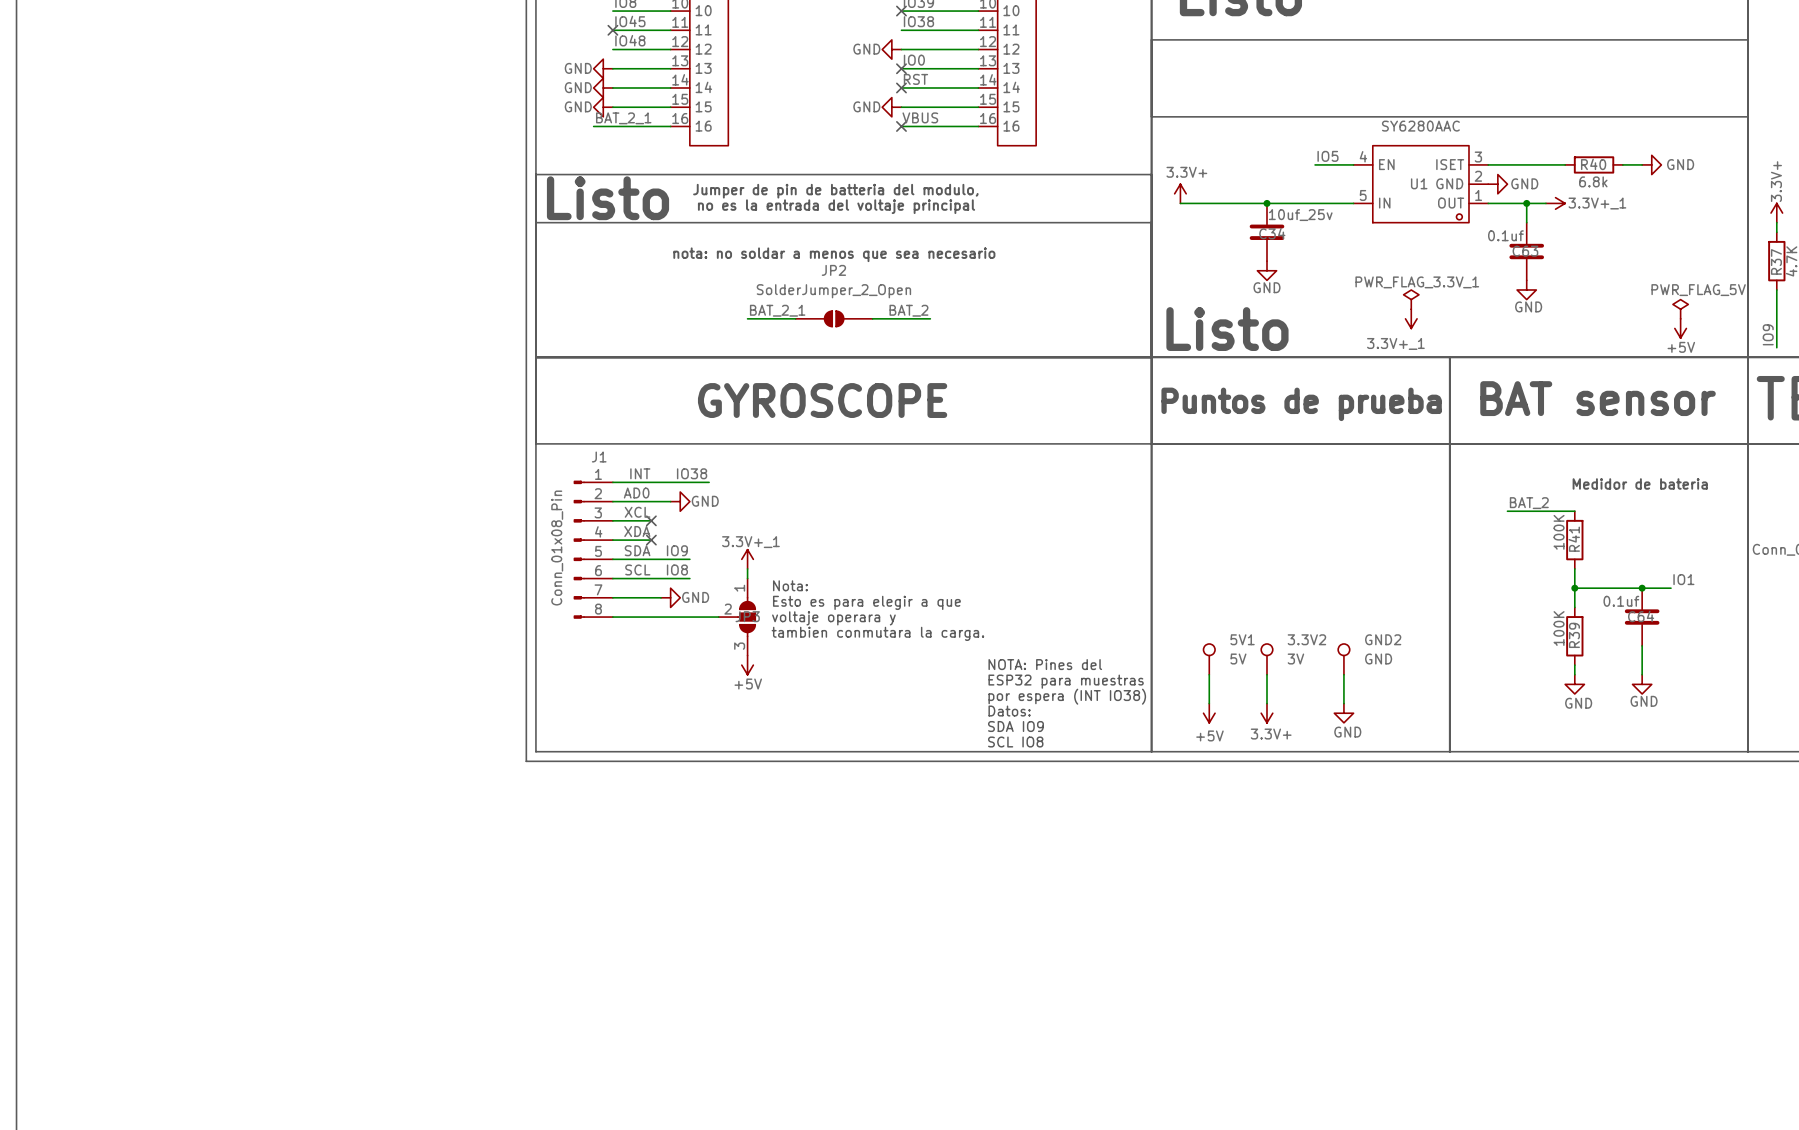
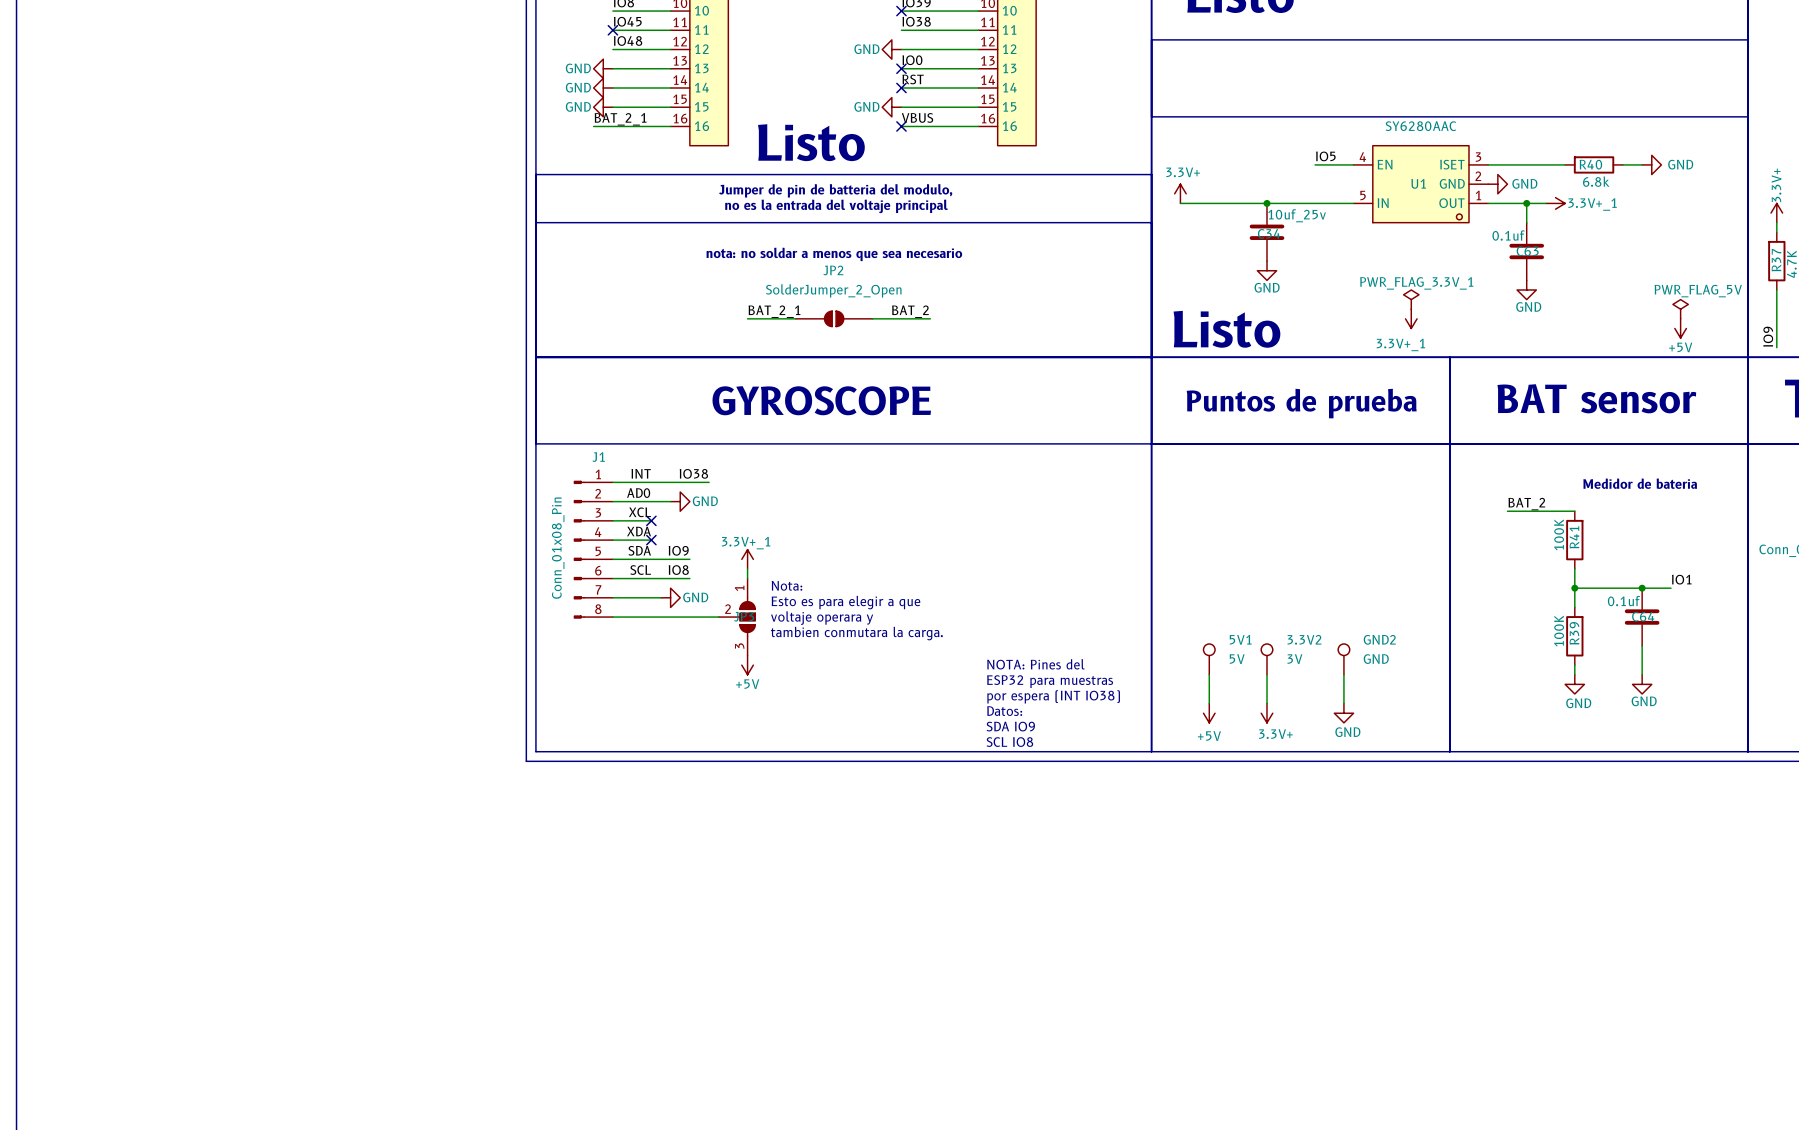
text: none -> Listo (811, 142)
text: Listo (608, 198) -> none

